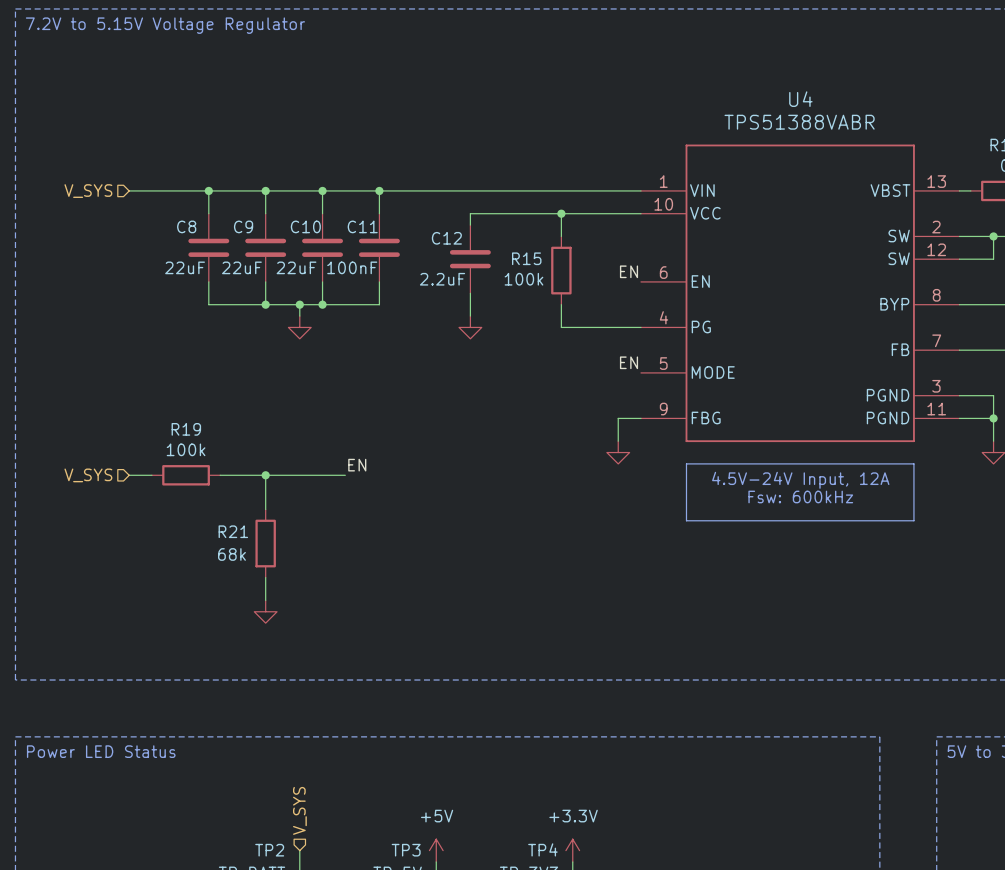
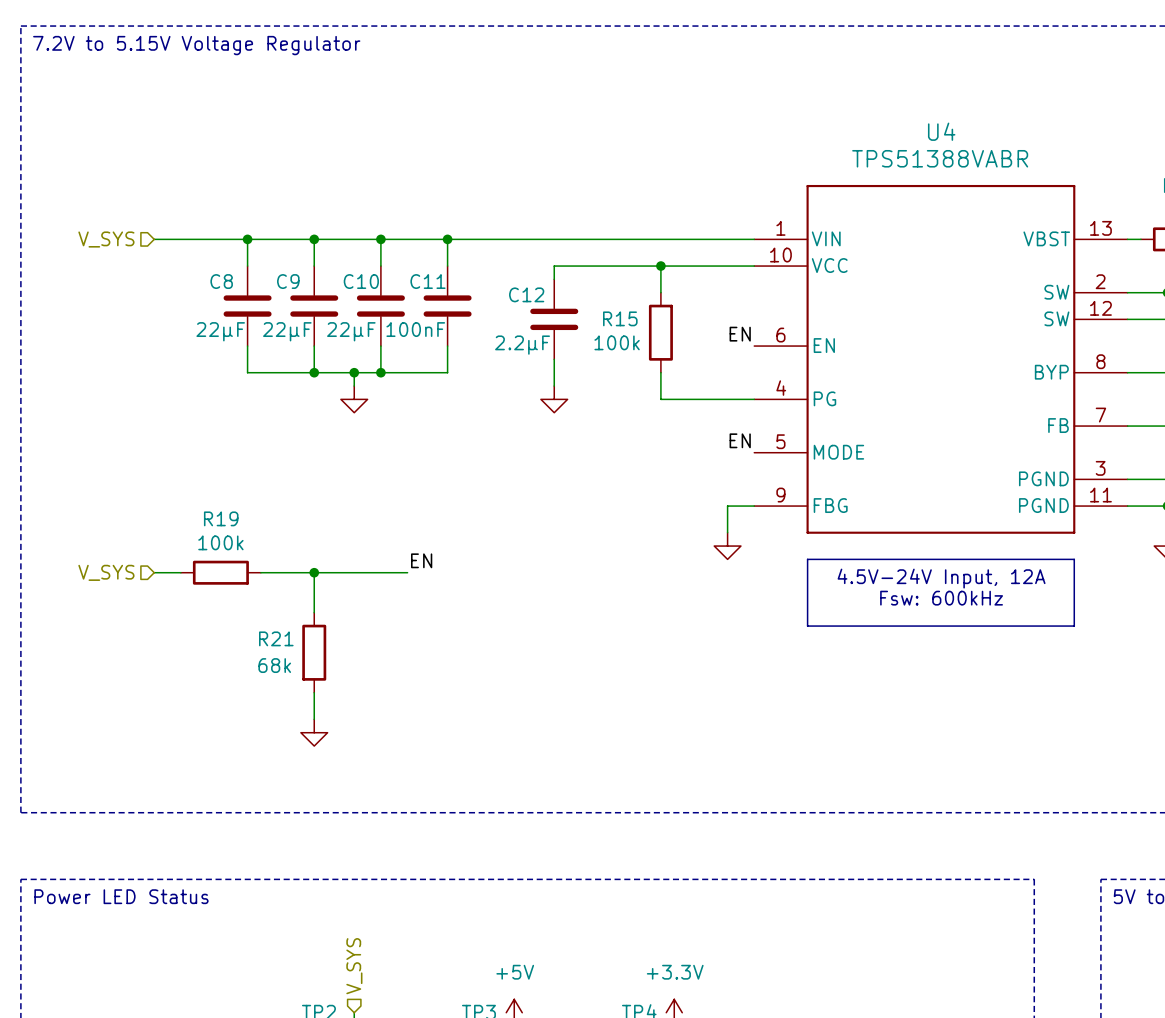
C8 value: 22uF (185, 267) -> 22µF (220, 331)
C9 value: 22uF (241, 267) -> 22µF (287, 331)
C10 value: 22uF (296, 267) -> 22µF (351, 331)
C12 value: 2.2uF (442, 279) -> 2.2µF (522, 345)

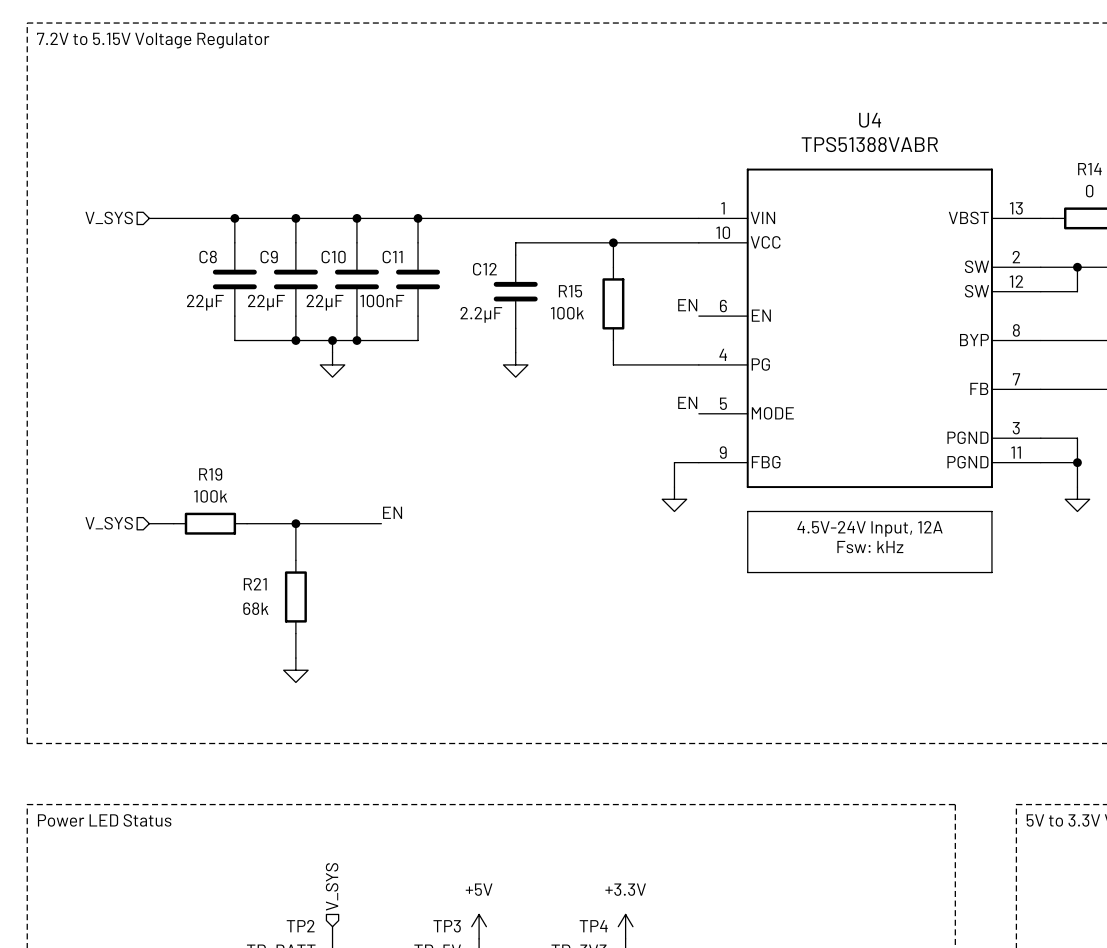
text: Fsw: 600kHz (941, 598) -> Fsw: kHz (870, 547)

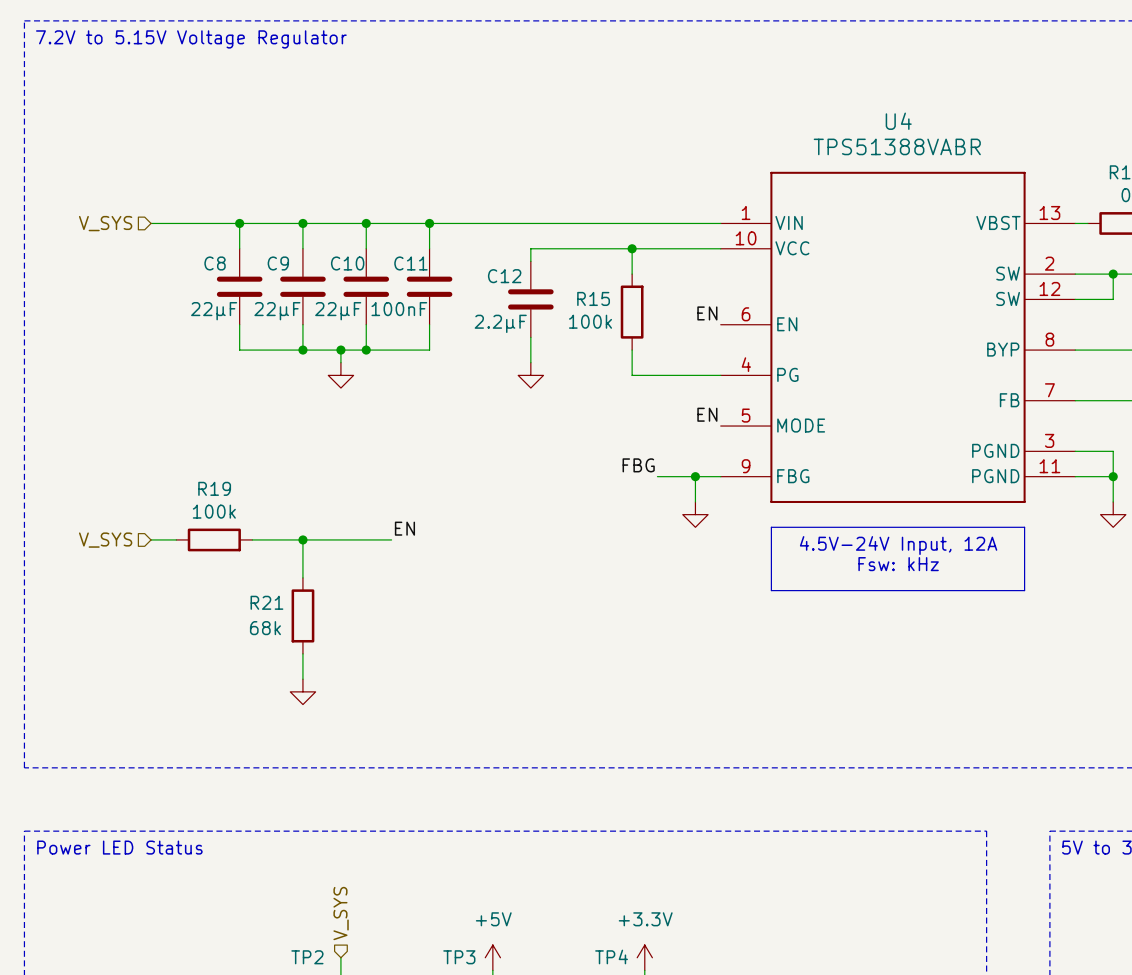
label: none -> FBG (638, 465)
wire: none -> (657, 476) (695, 476)
junction: none -> (695, 476)

